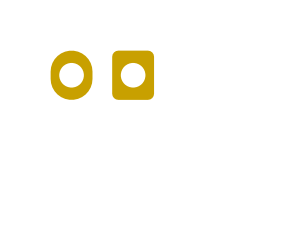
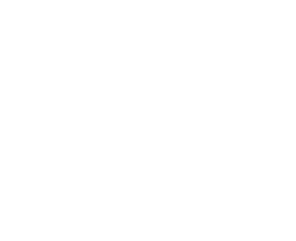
part: (102, 75) -> none

